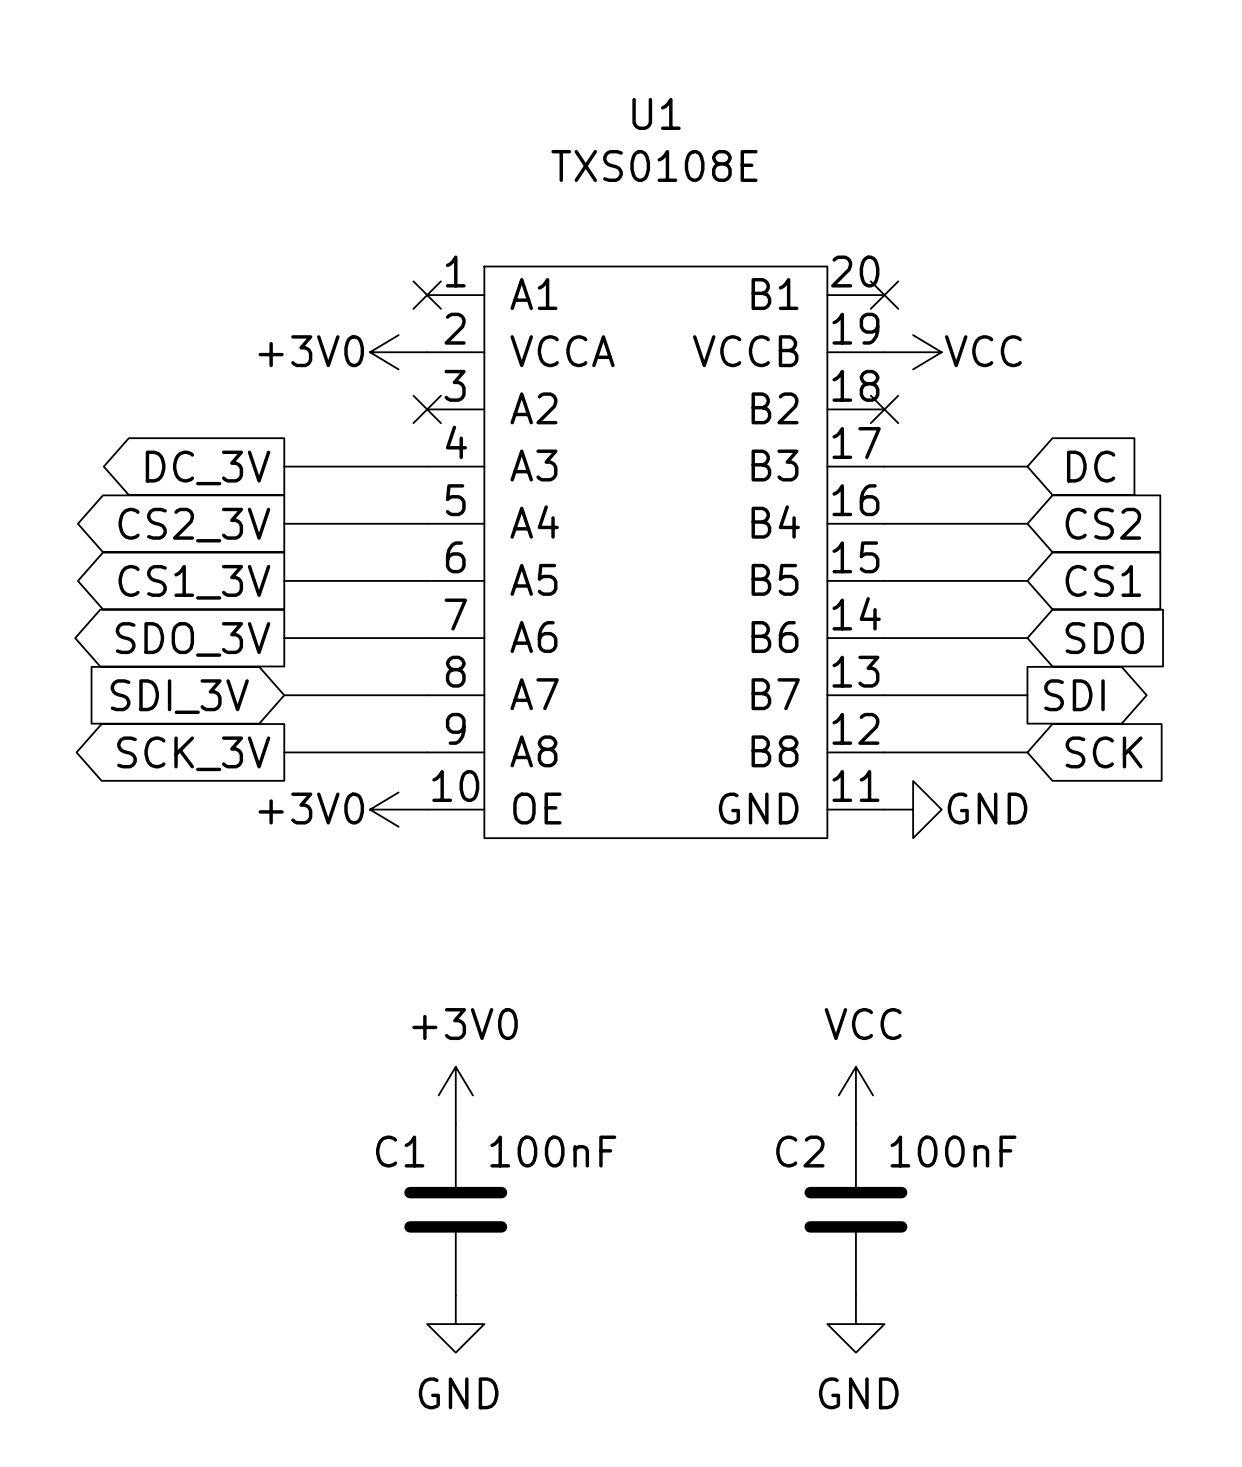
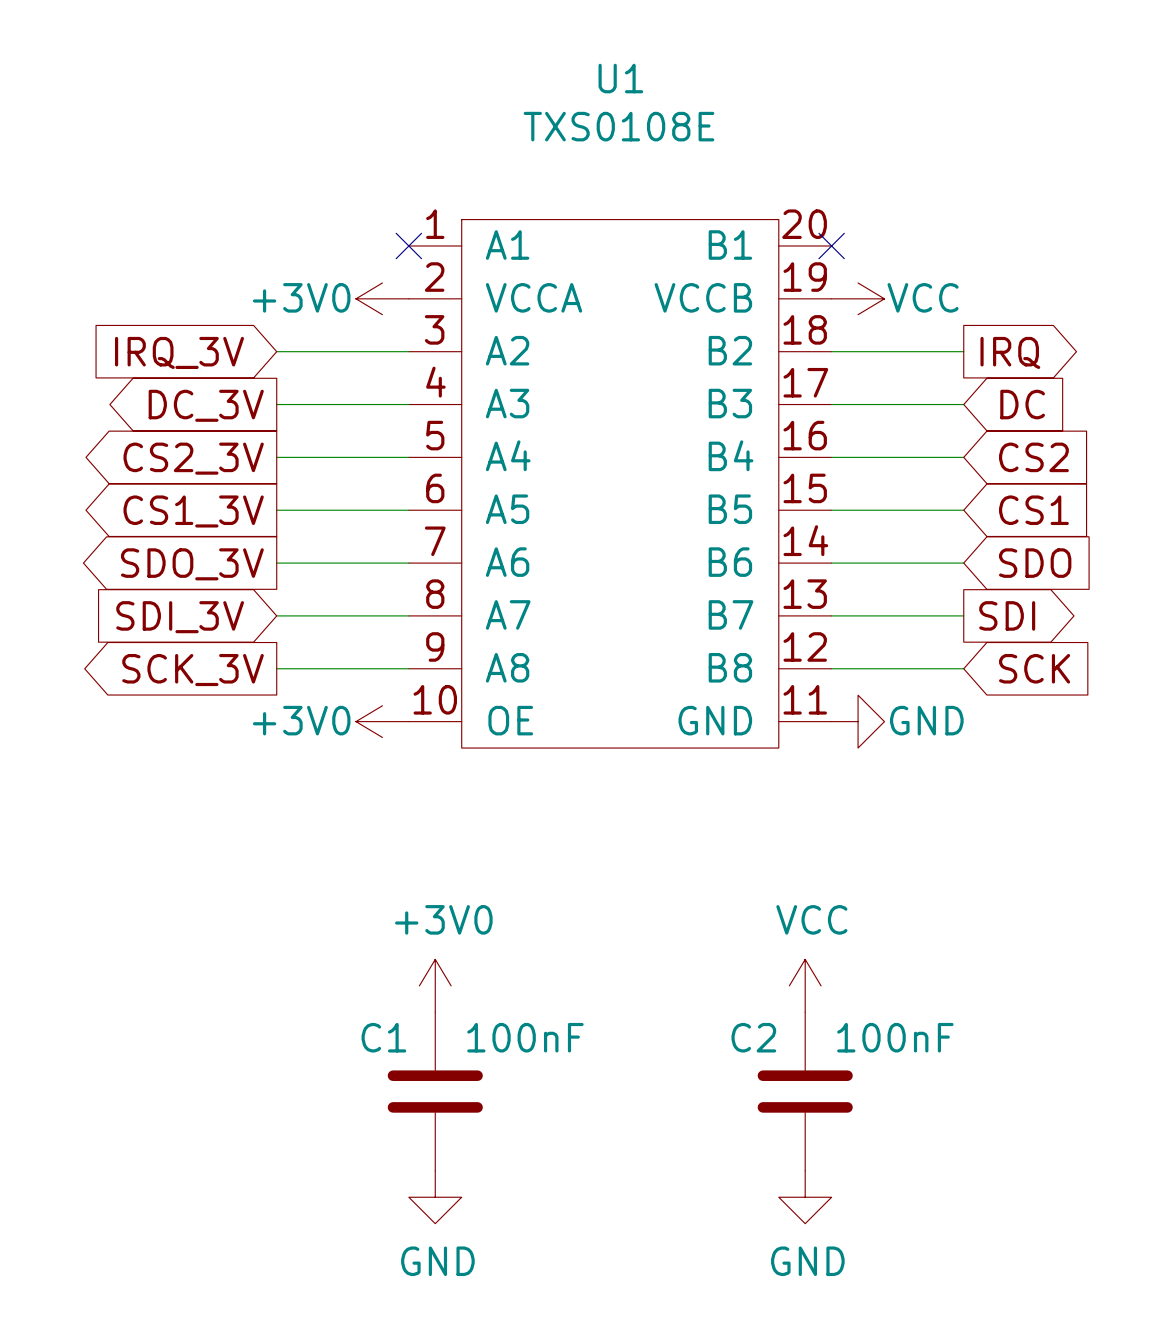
wire: none -> (276, 351) (408, 351)
no-connect mark: (427, 409) -> none
wire: none -> (831, 351) (963, 351)
no-connect mark: (884, 409) -> none
global label: none -> IRQ_3V (179, 352)
global label: none -> IRQ (1010, 352)

